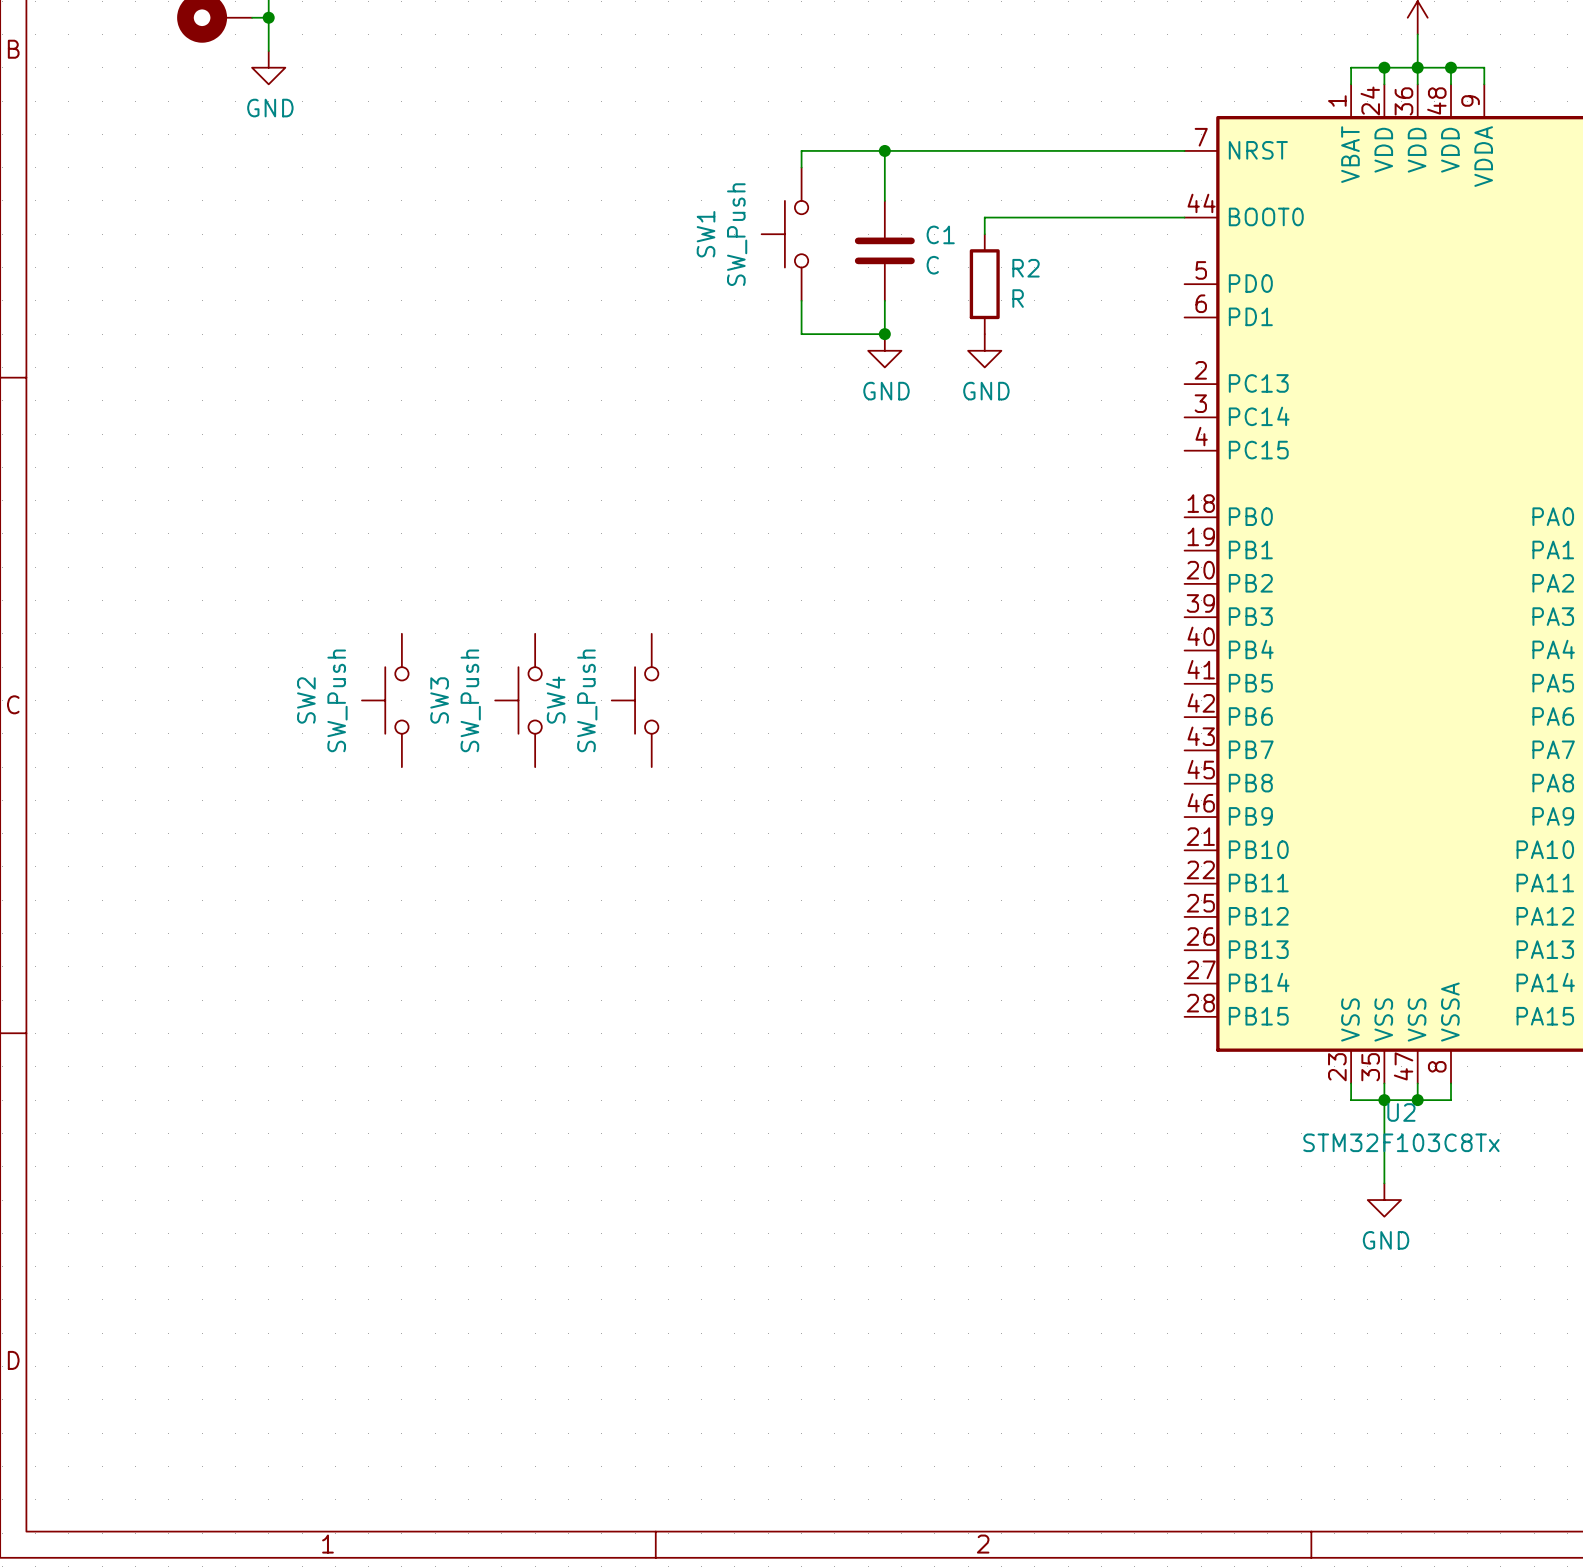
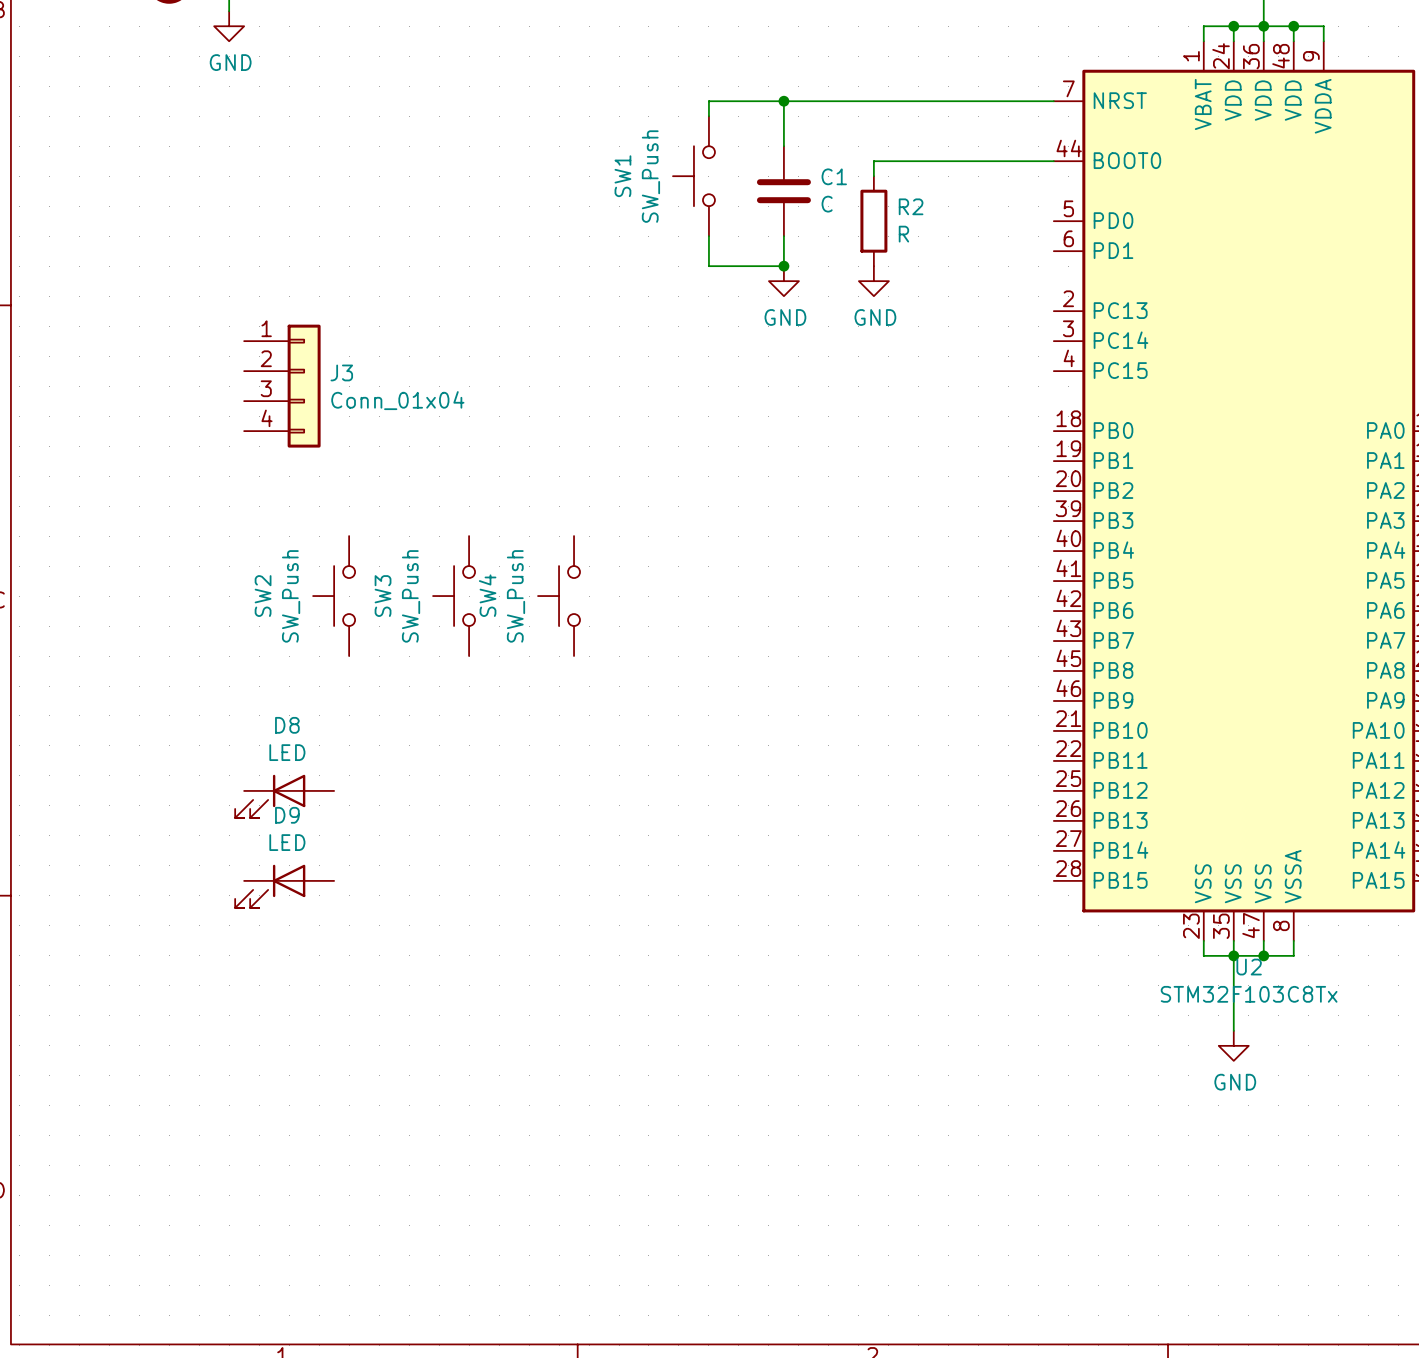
J3: none -> Conn_01x04 (282, 386)
D8: none -> LED (284, 796)
D9: none -> LED (284, 886)

